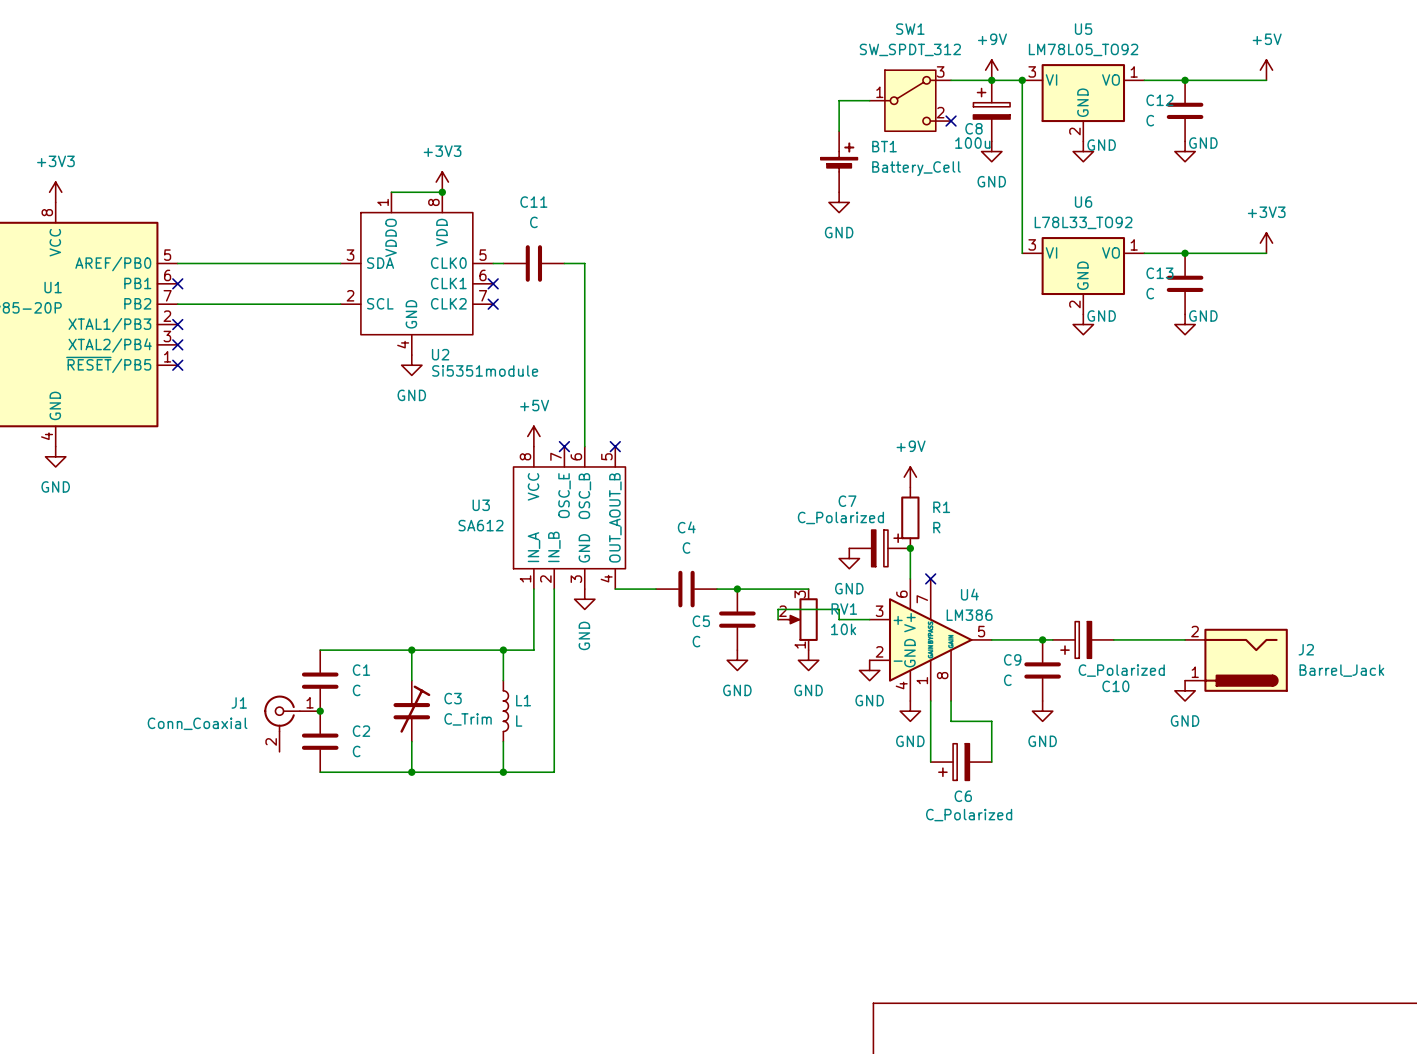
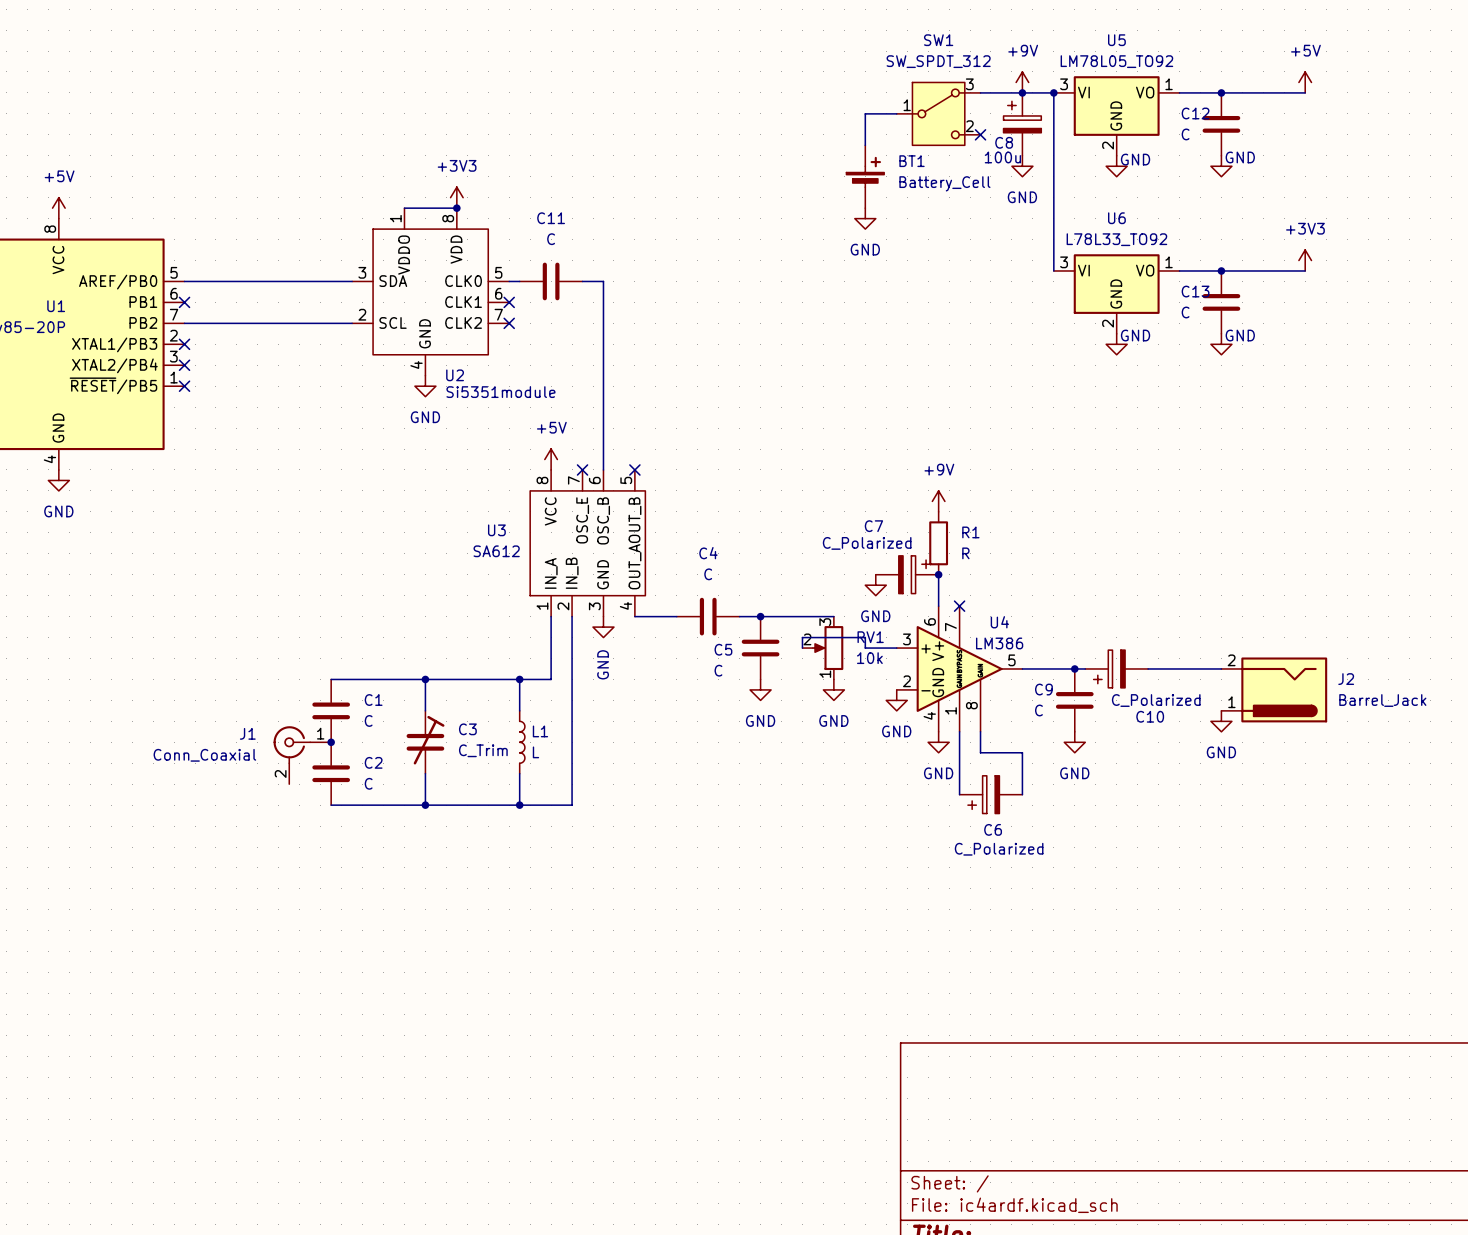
power symbol: +3V3 (55, 192) -> +5V (58, 208)

